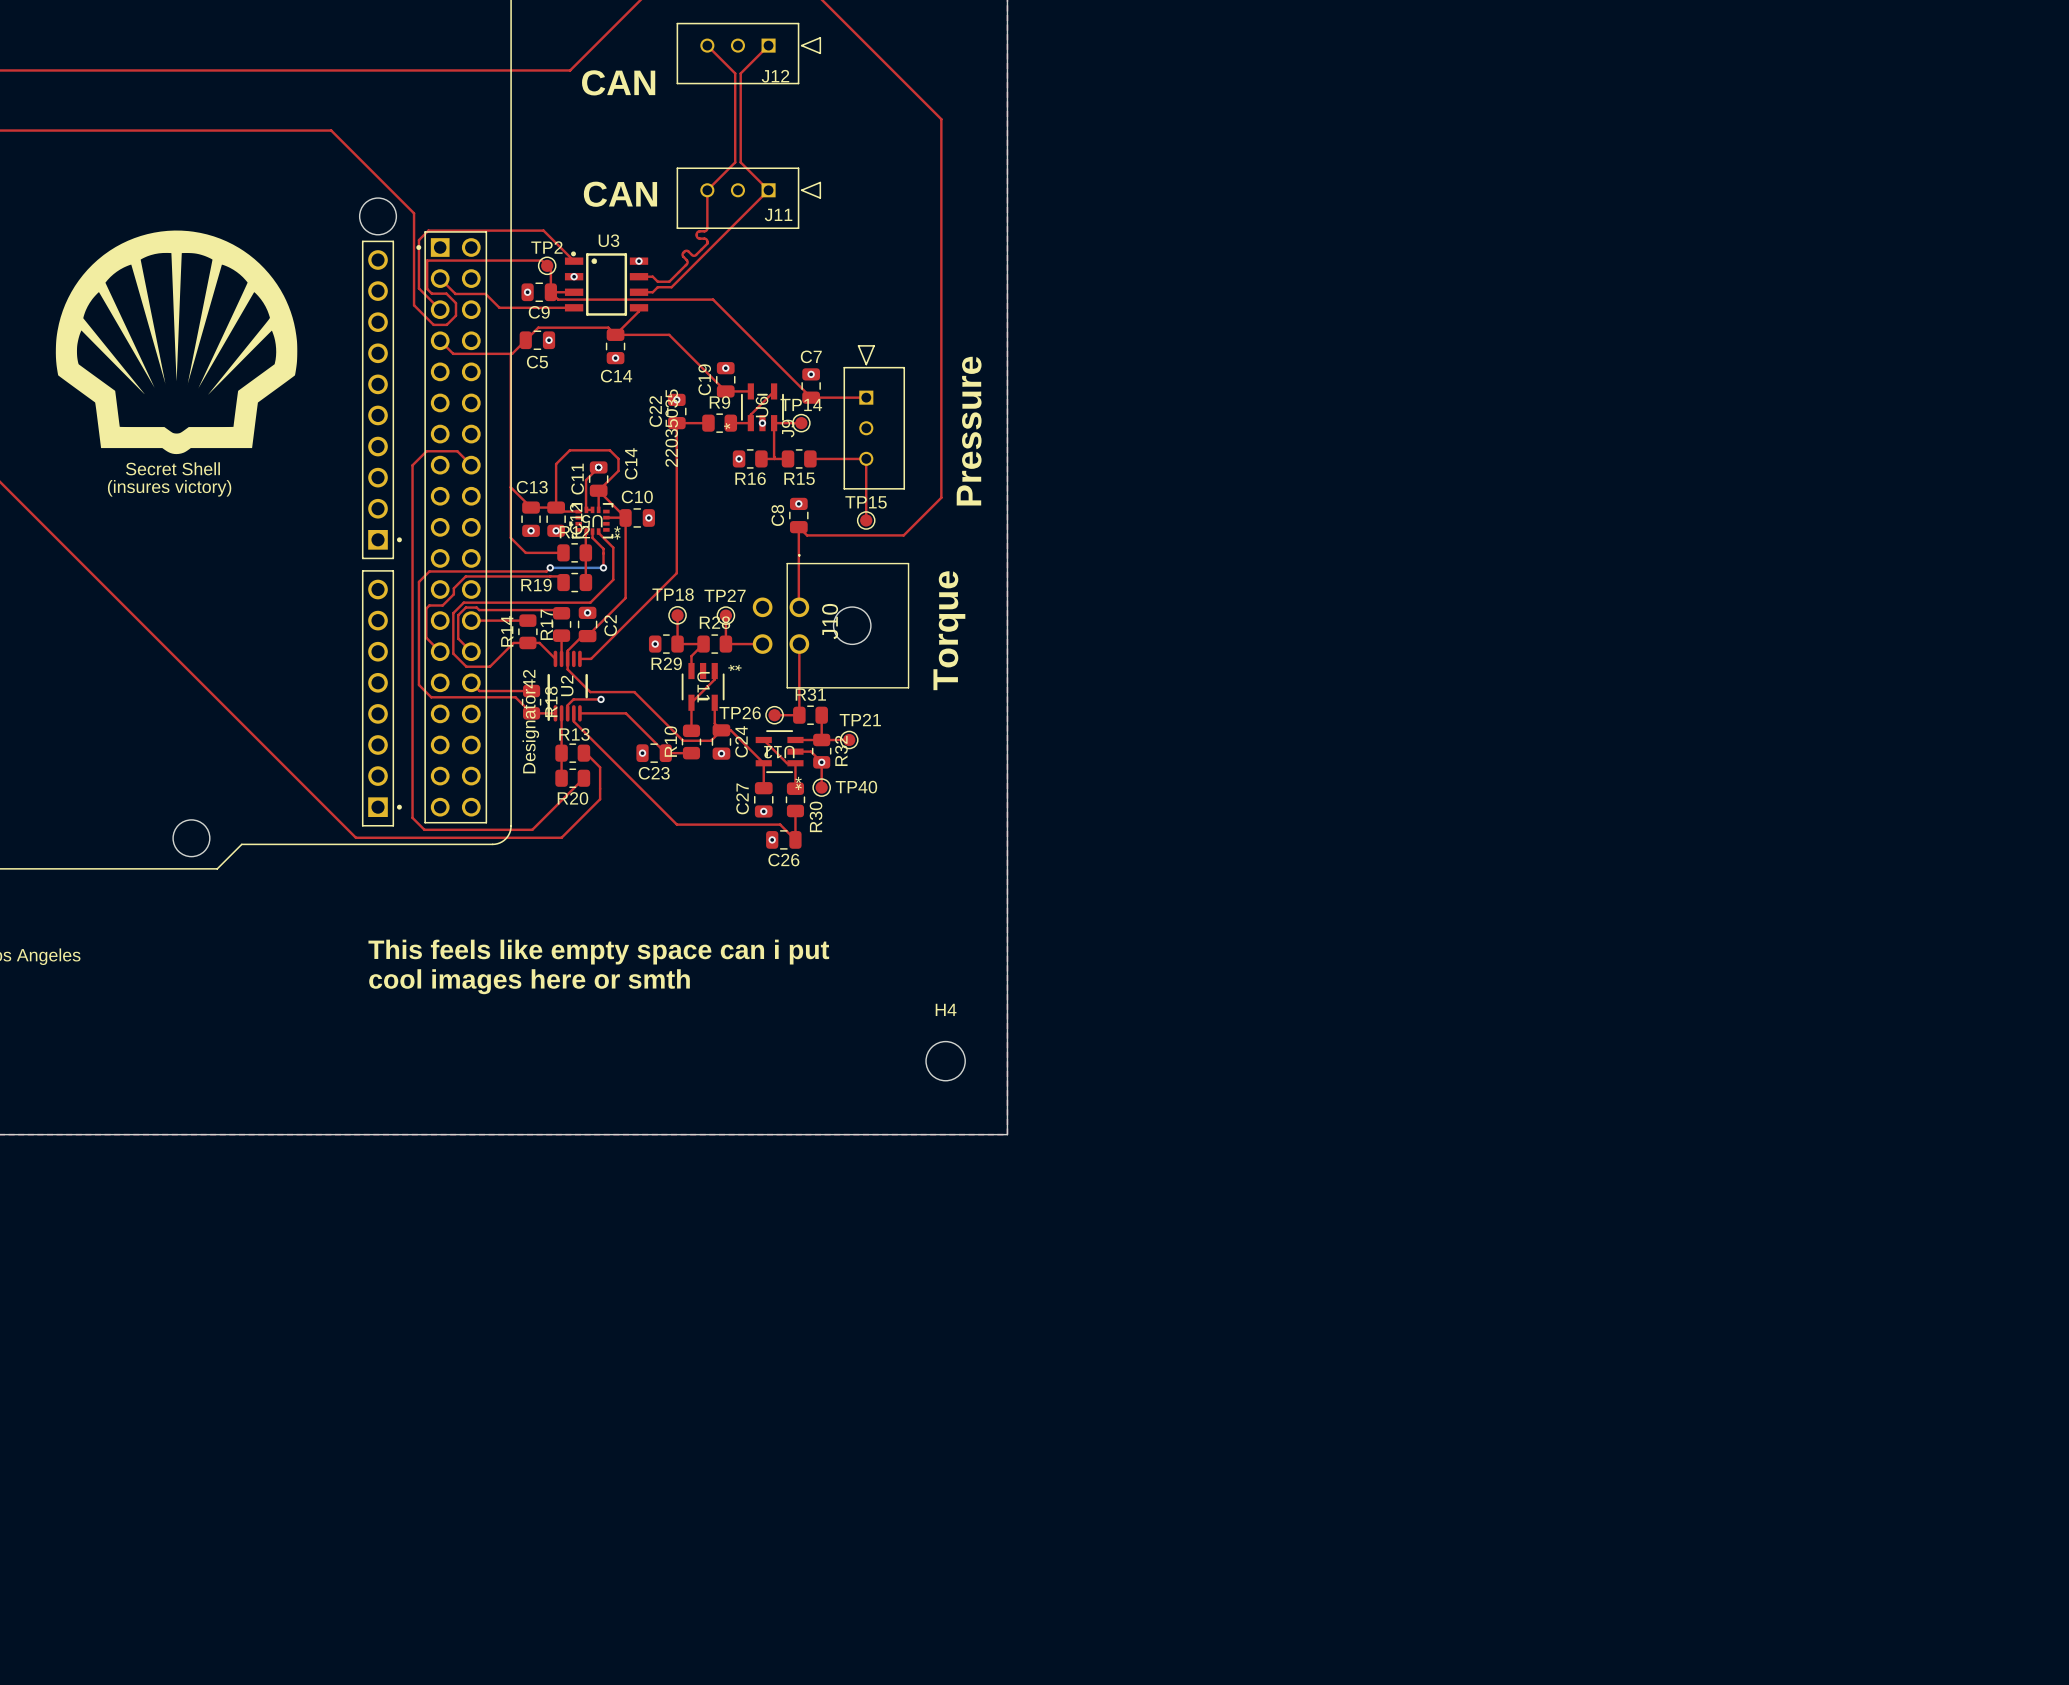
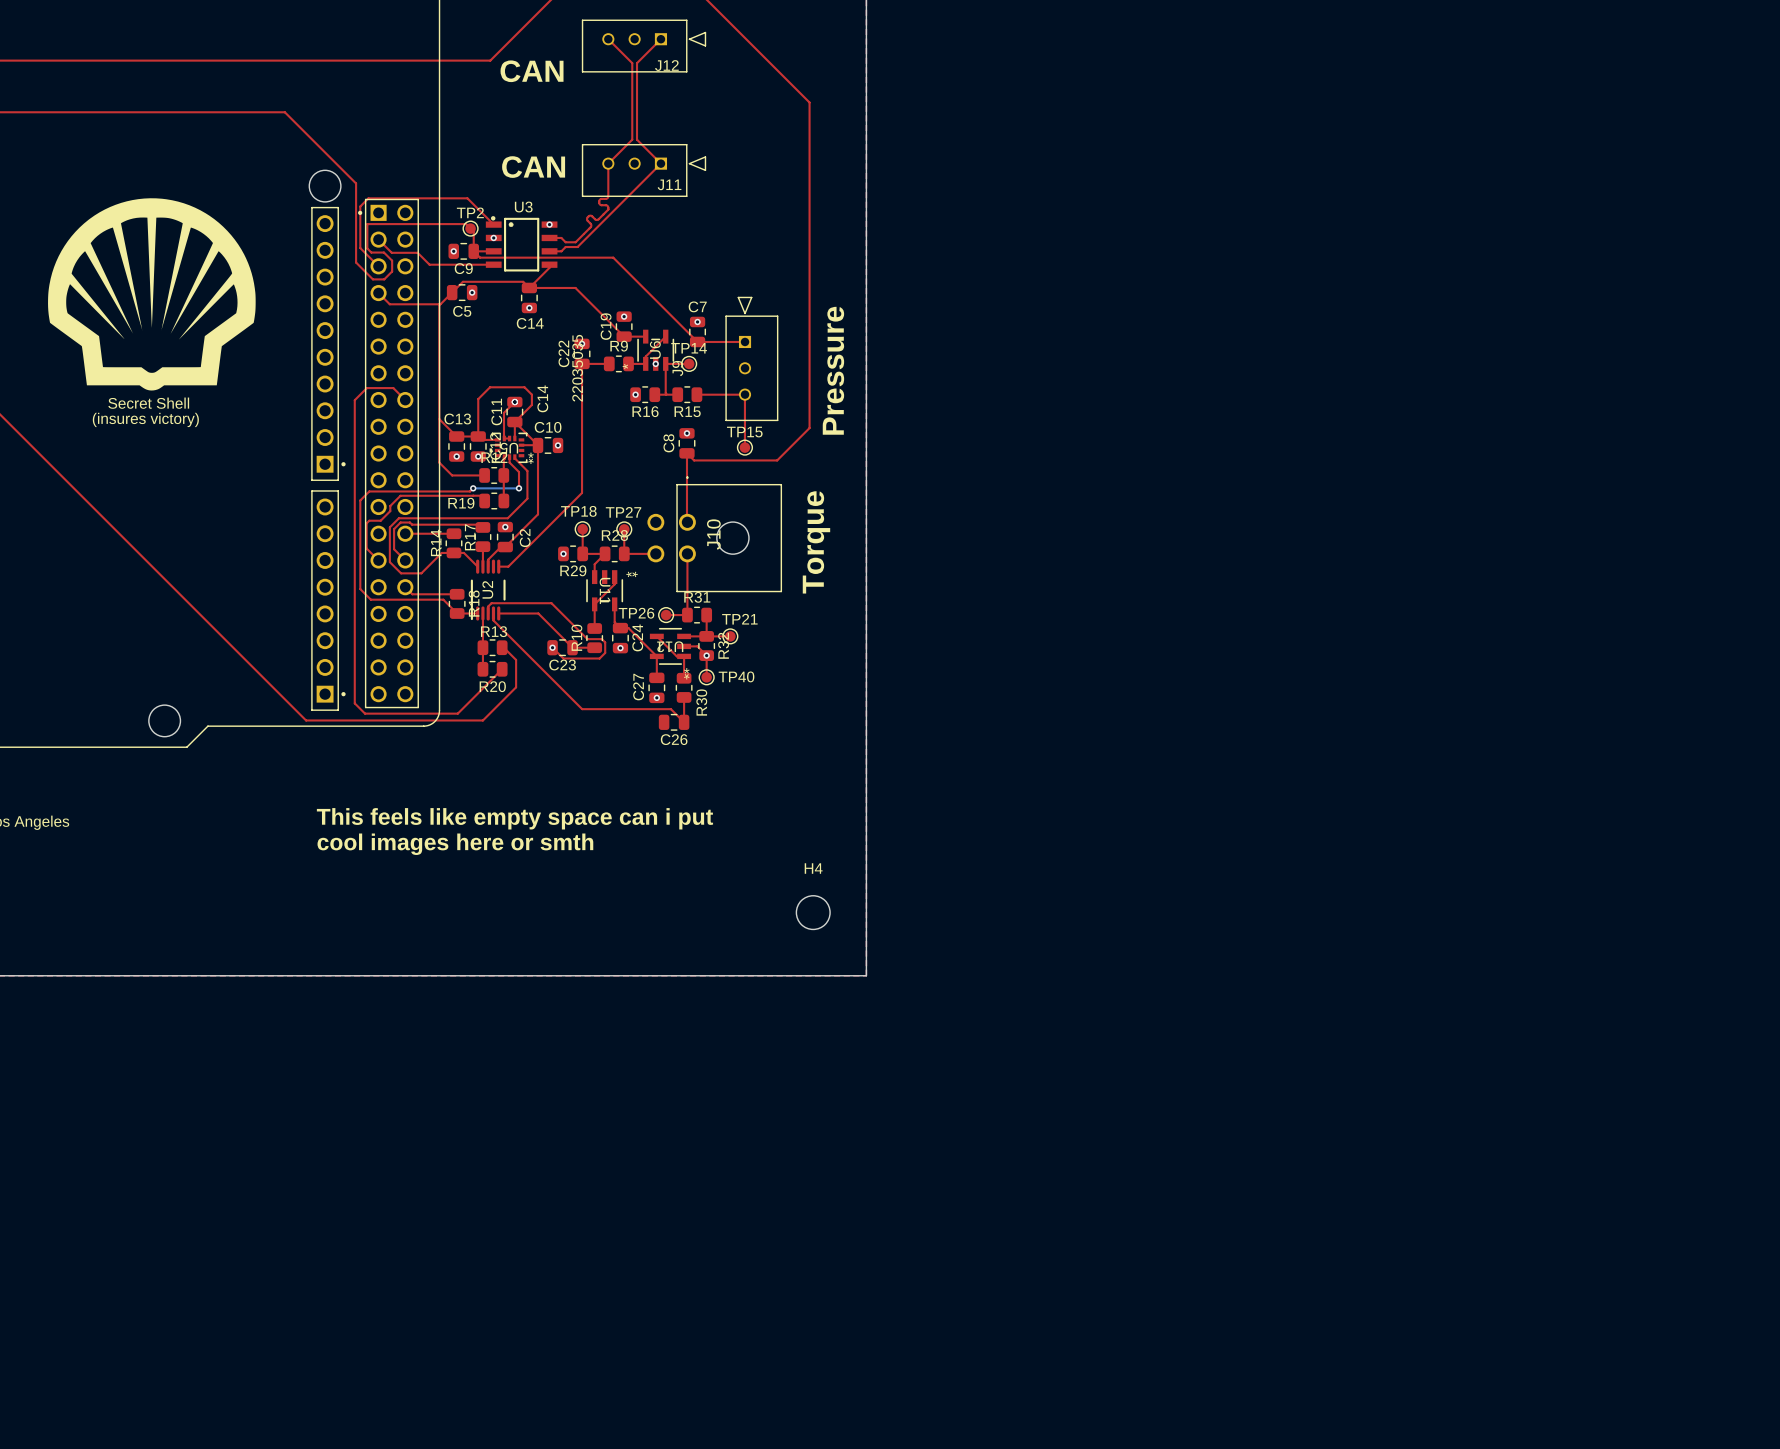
top track: (567, 658) (567, 669) (590, 692) (634, 692) (683, 740) (711, 740) (721, 730) -> none
top track: (601, 699) (573, 699) (571, 701) -> (552, 647) (563, 658) (599, 658) (605, 652) (605, 642) (601, 639) (587, 639) (551, 603) (491, 603)
via: (601, 699) -> none
U2 text: Designator42 (530, 721) -> none
via: (772, 839) -> none

